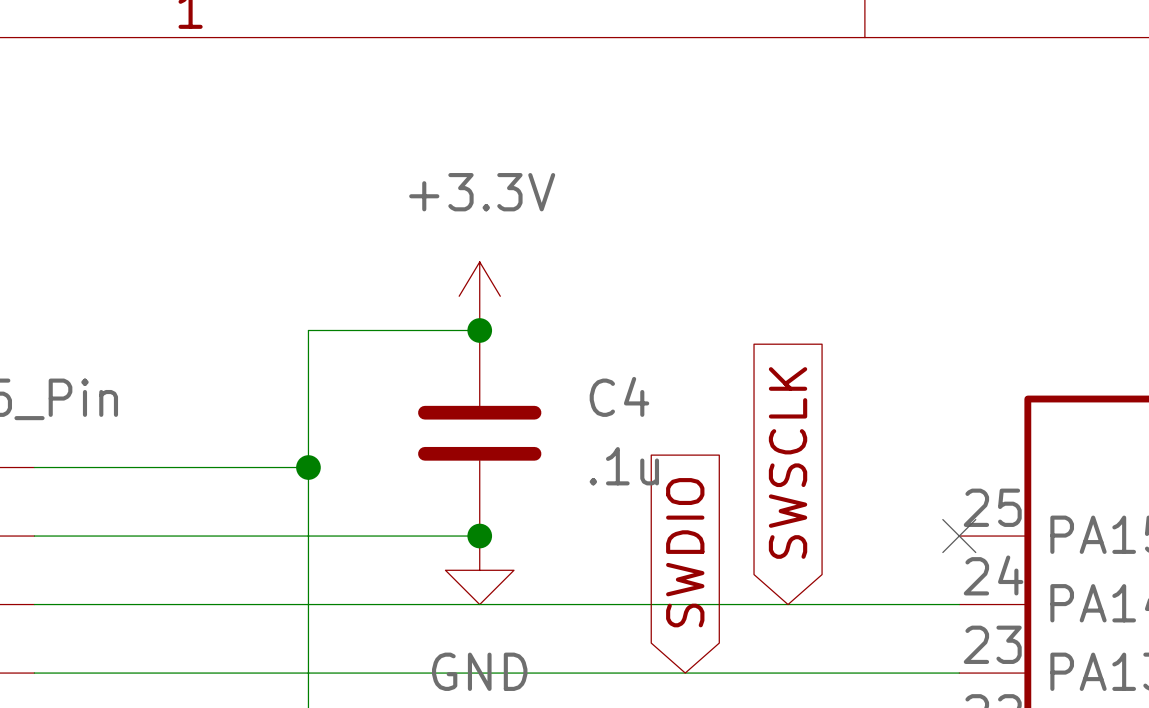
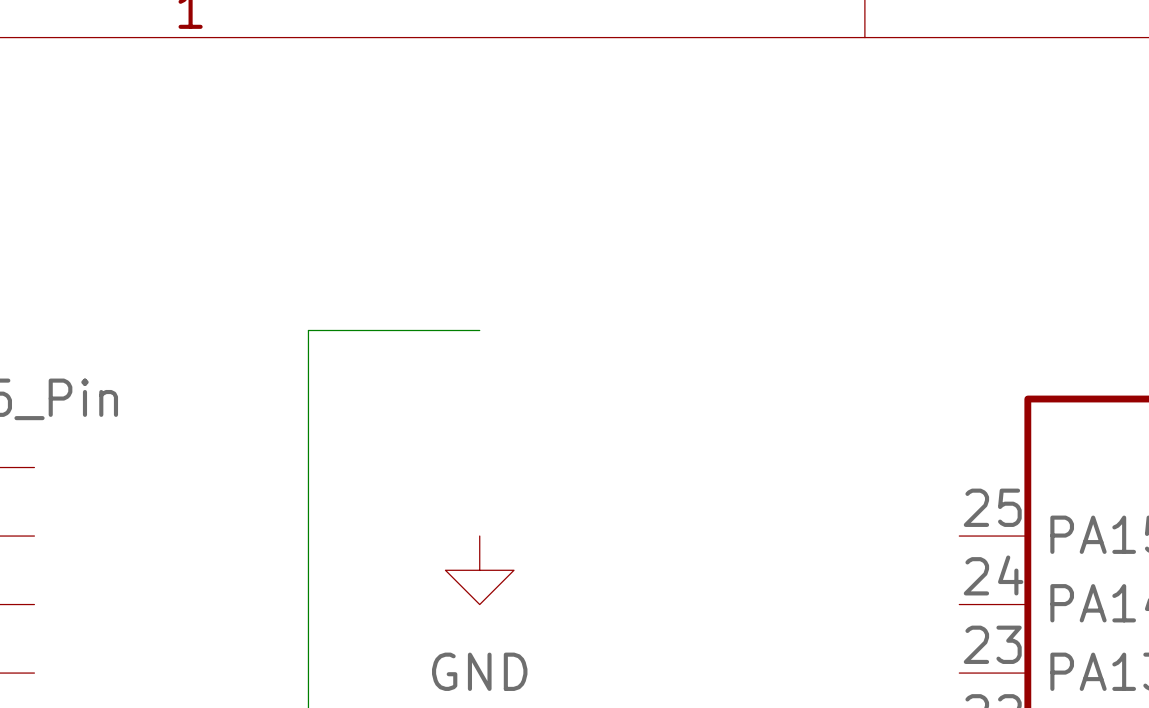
power symbol: +3.3V (479, 296) -> none
junction: (479, 330) -> none
C4: .1u (479, 433) -> none
global label: SWSCLK (788, 462) -> none
wire: (34, 467) (308, 467) -> none
junction: (308, 467) -> none
wire: (34, 536) (479, 536) -> none
junction: (479, 536) -> none
no-connect mark: (959, 536) -> none
global label: SWDIO (685, 552) -> none
wire: (34, 604) (959, 604) -> none
wire: (34, 673) (959, 673) -> none

